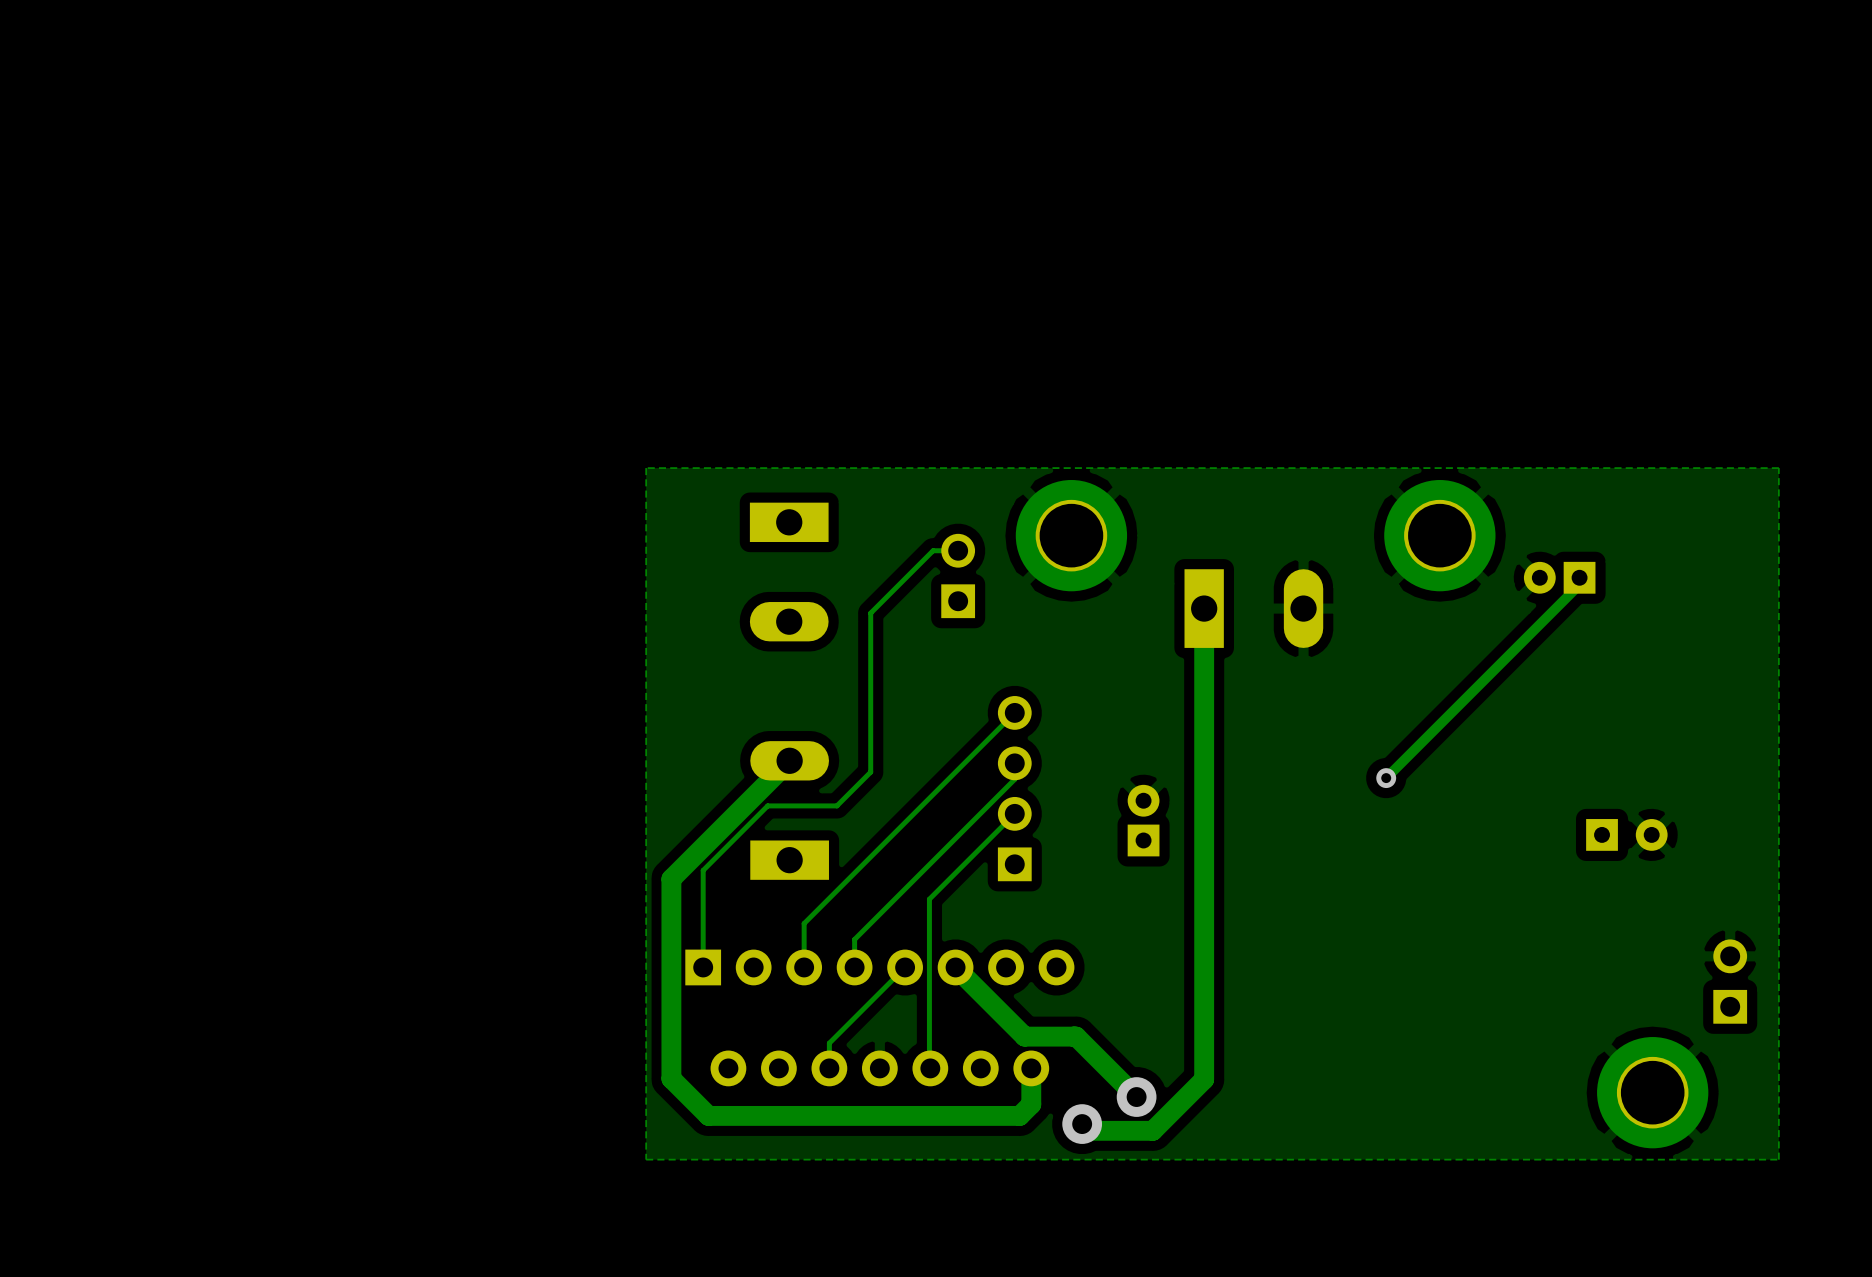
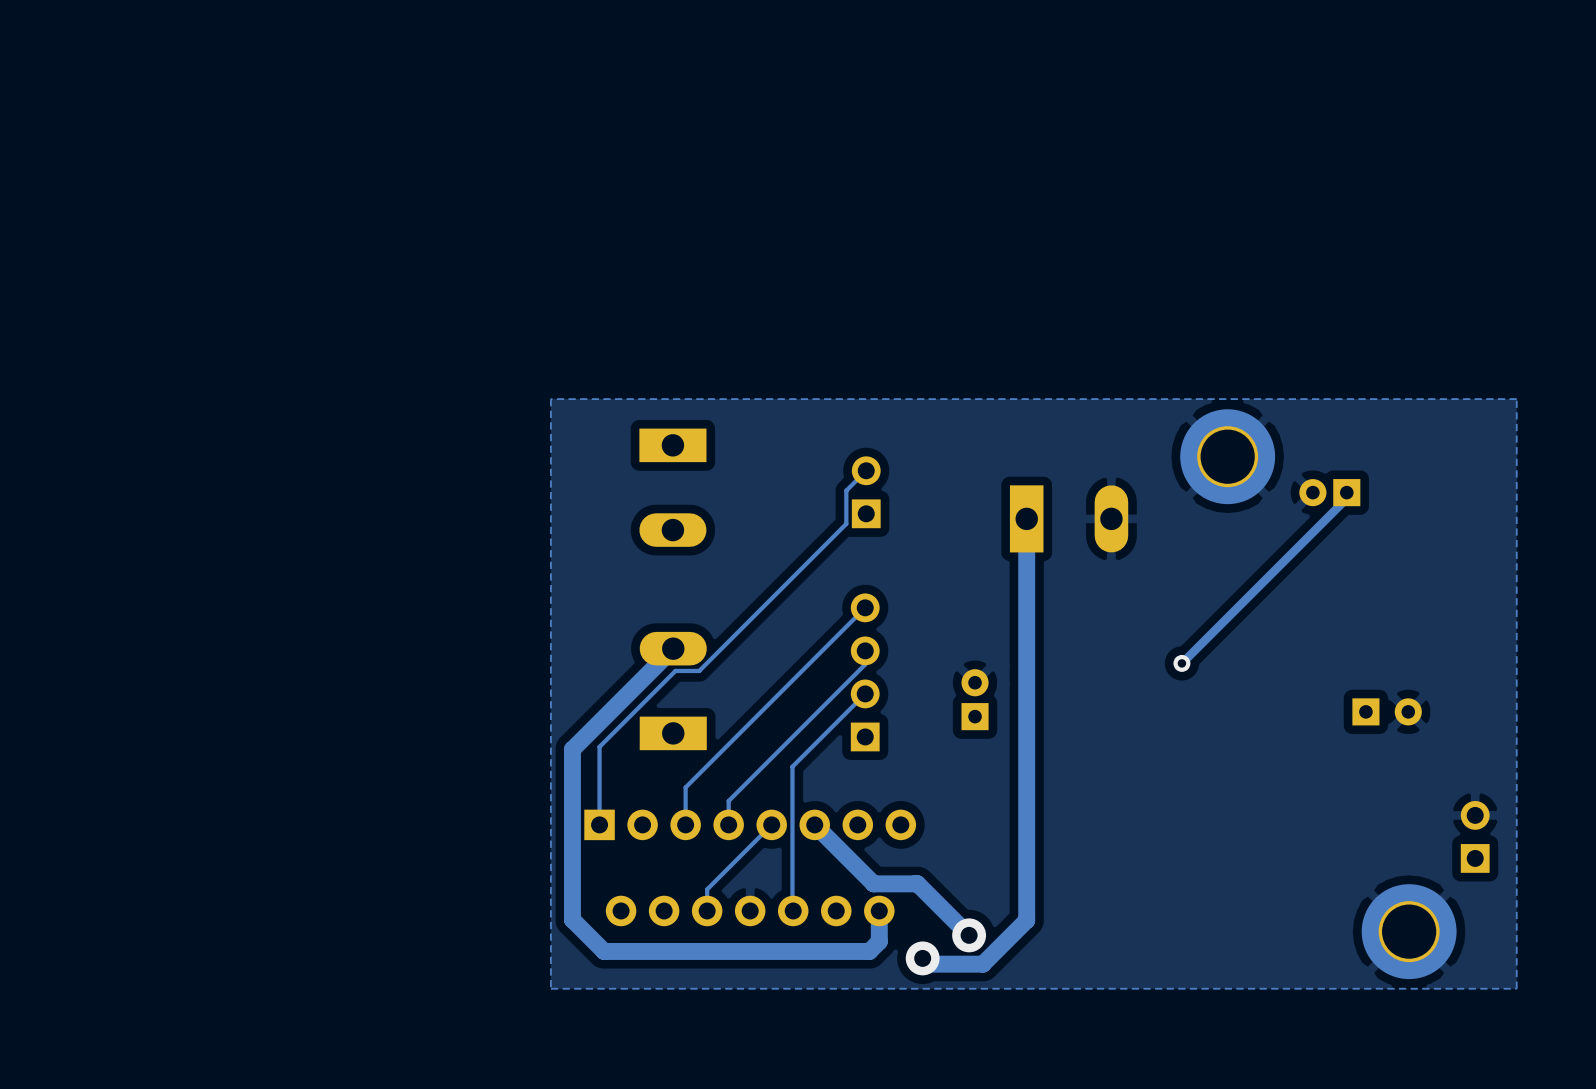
part: (1071, 535) -> none
track: (958, 550) (933, 550) (870, 613) (870, 772) (836, 805) (767, 805) (703, 870) (703, 875) -> (866, 470) (846, 490) (846, 523) (699, 670) (675, 670) (599, 746)
part position: (958, 575) -> (866, 492)

